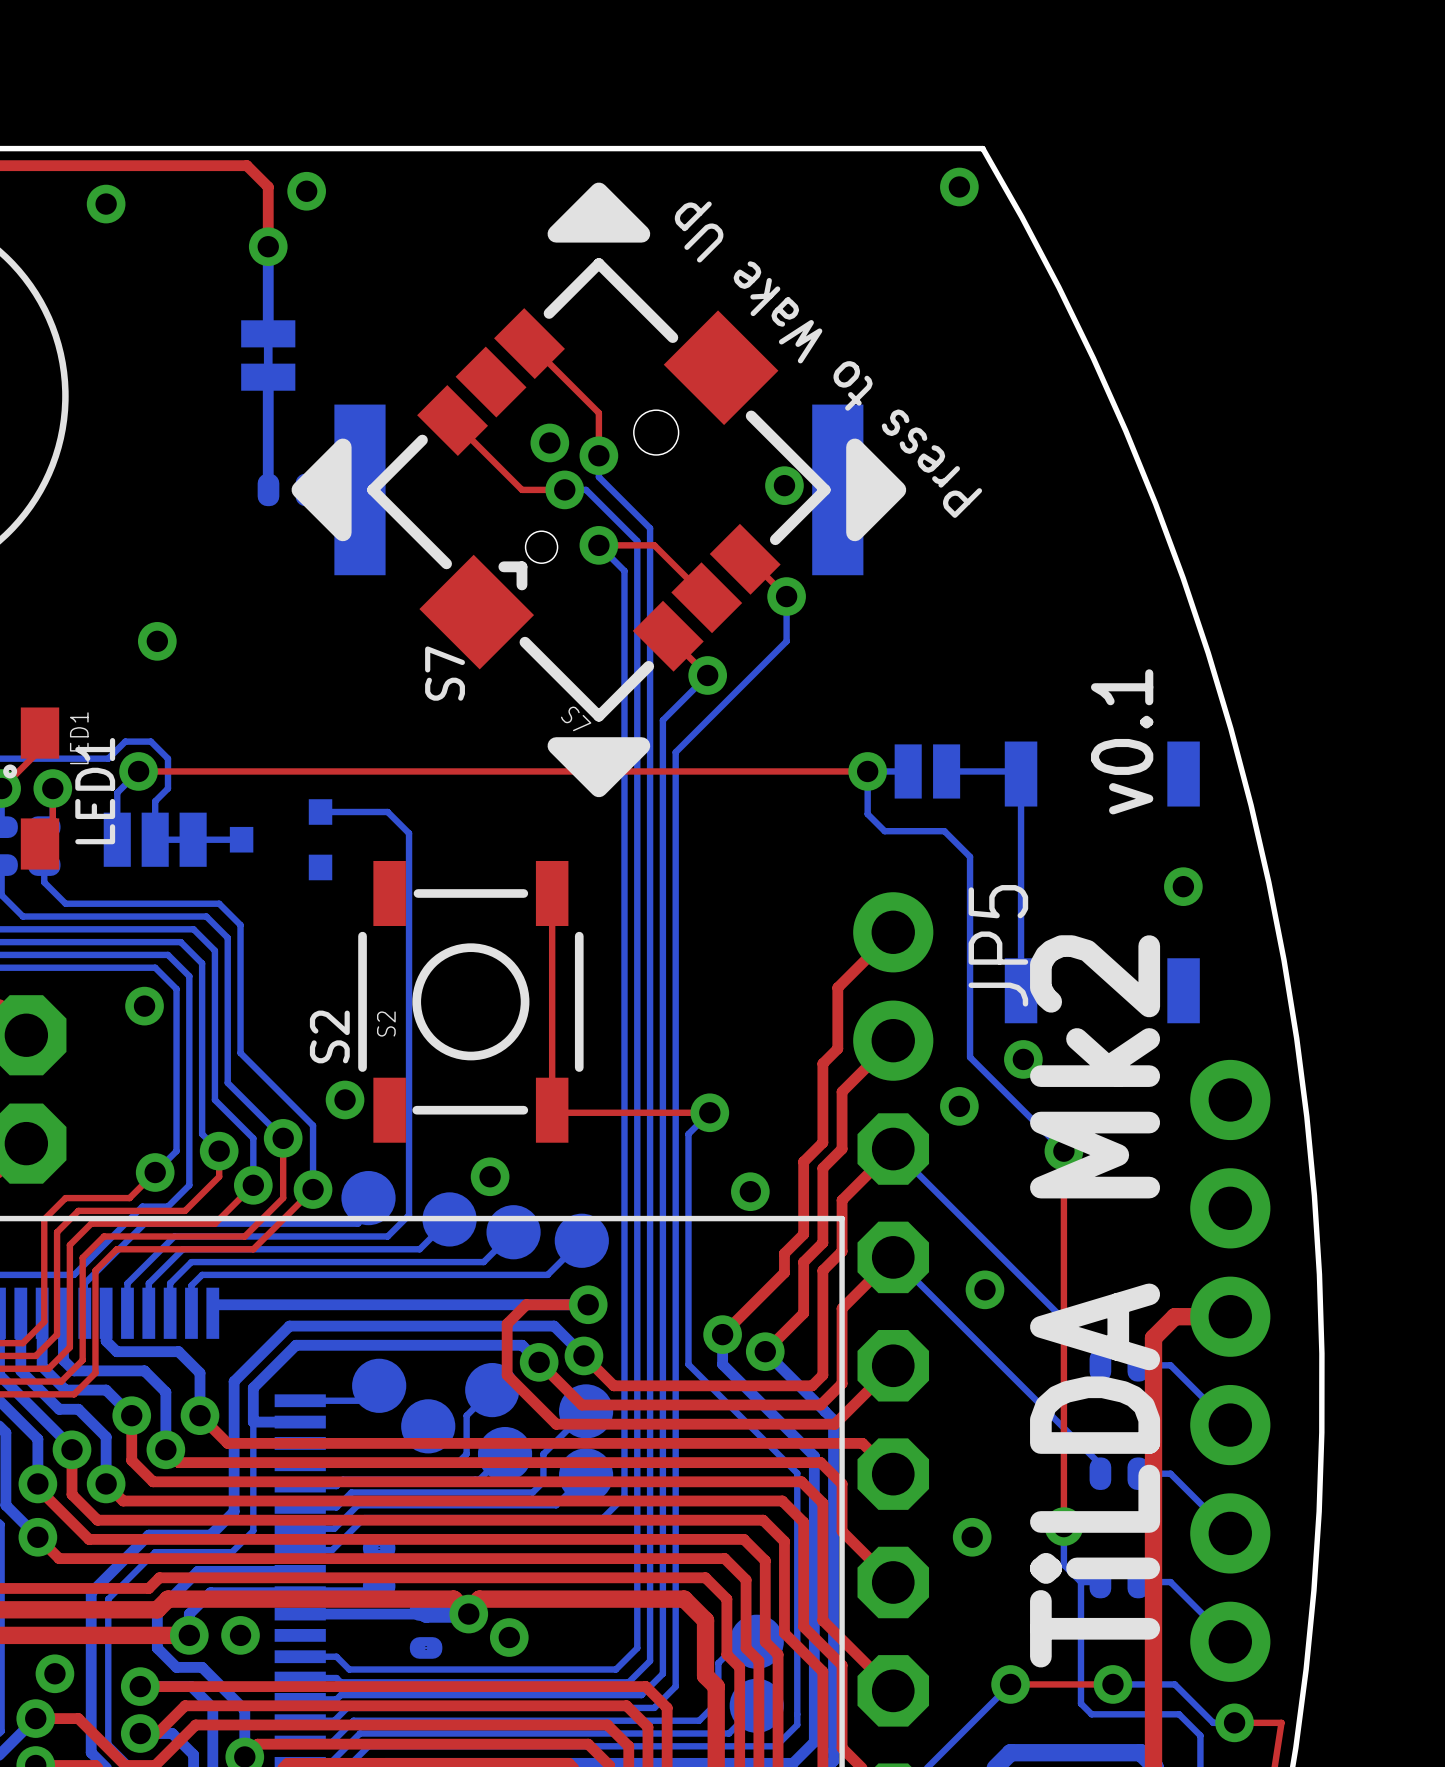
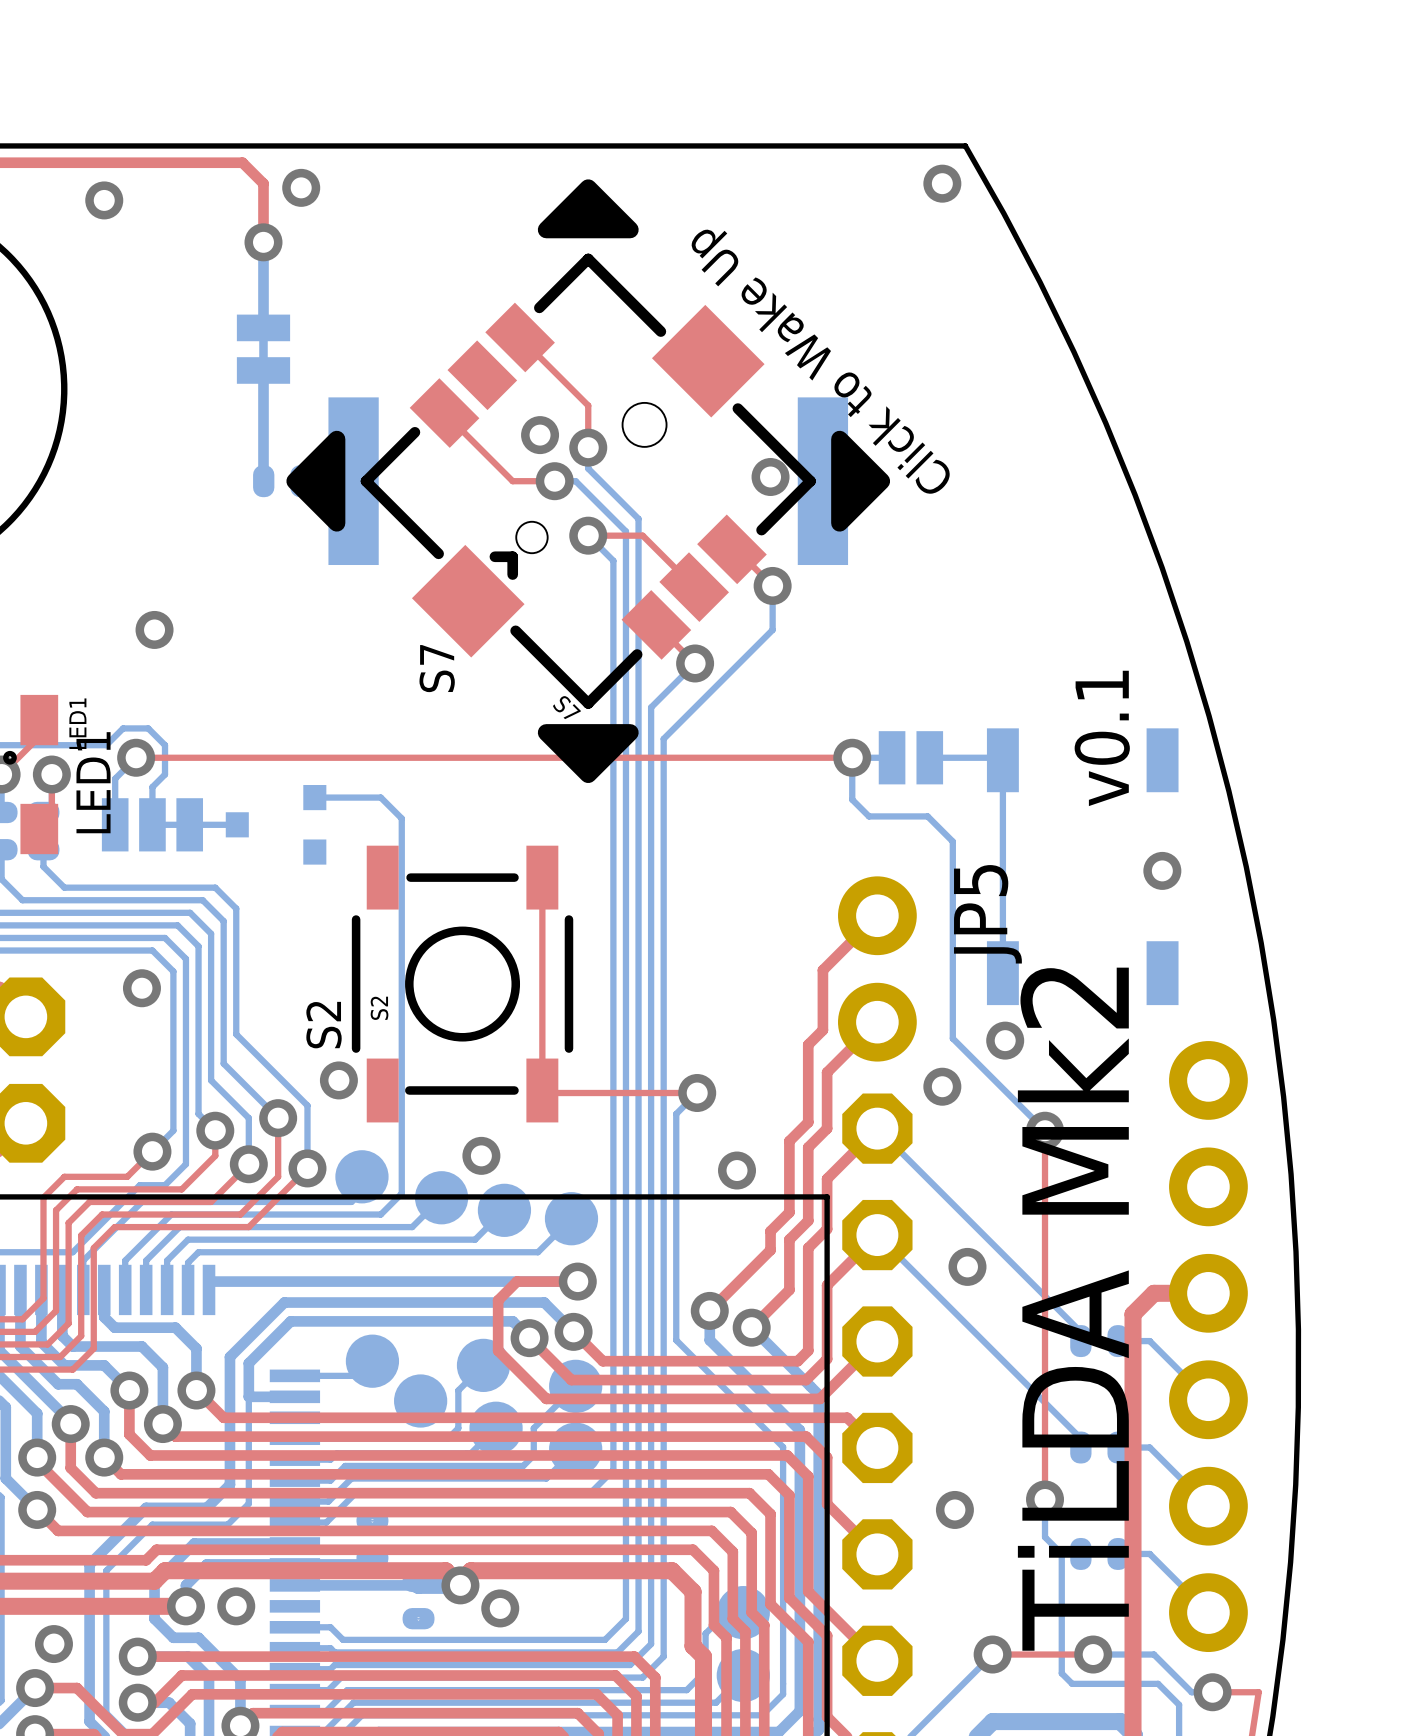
text: Press to Wake Up (828, 359) -> Click to Wake Up (820, 361)

